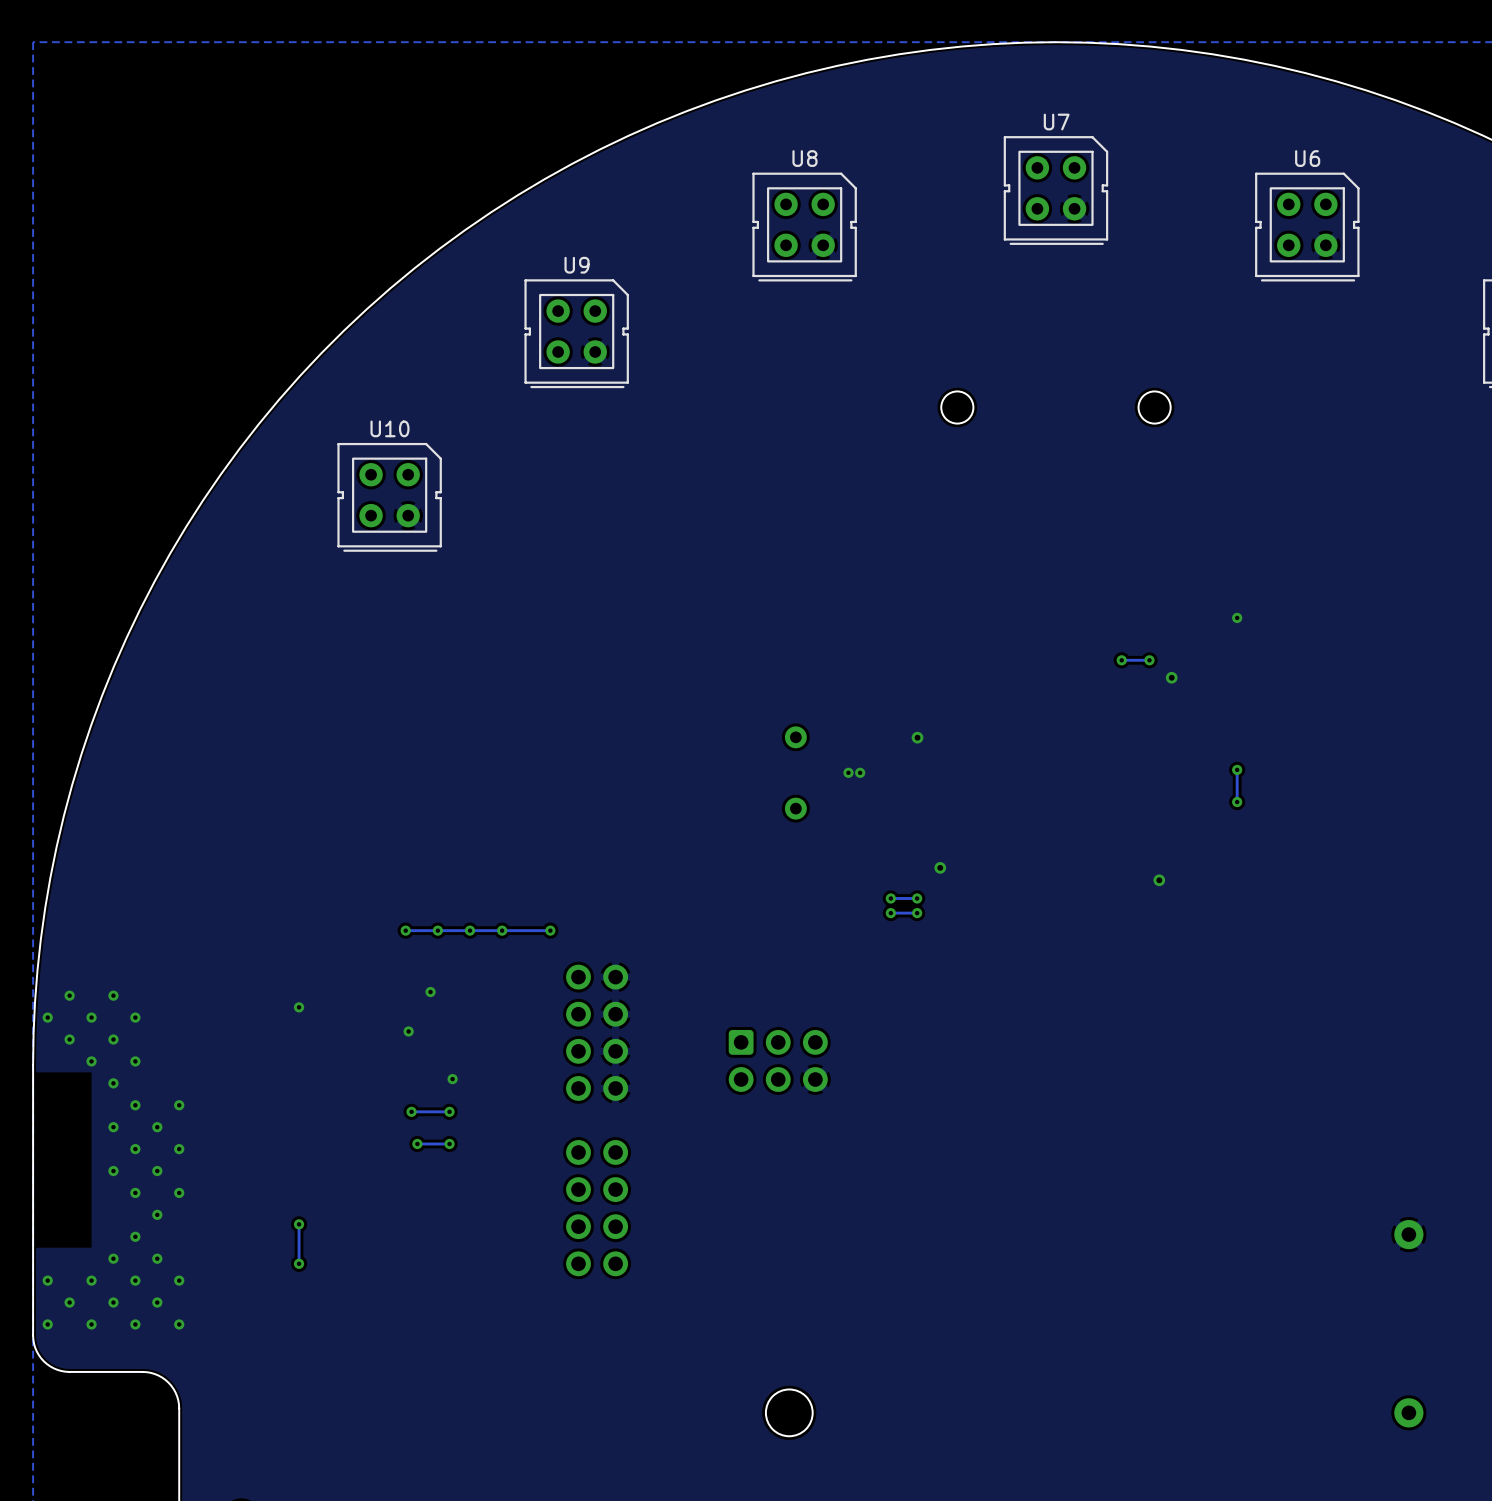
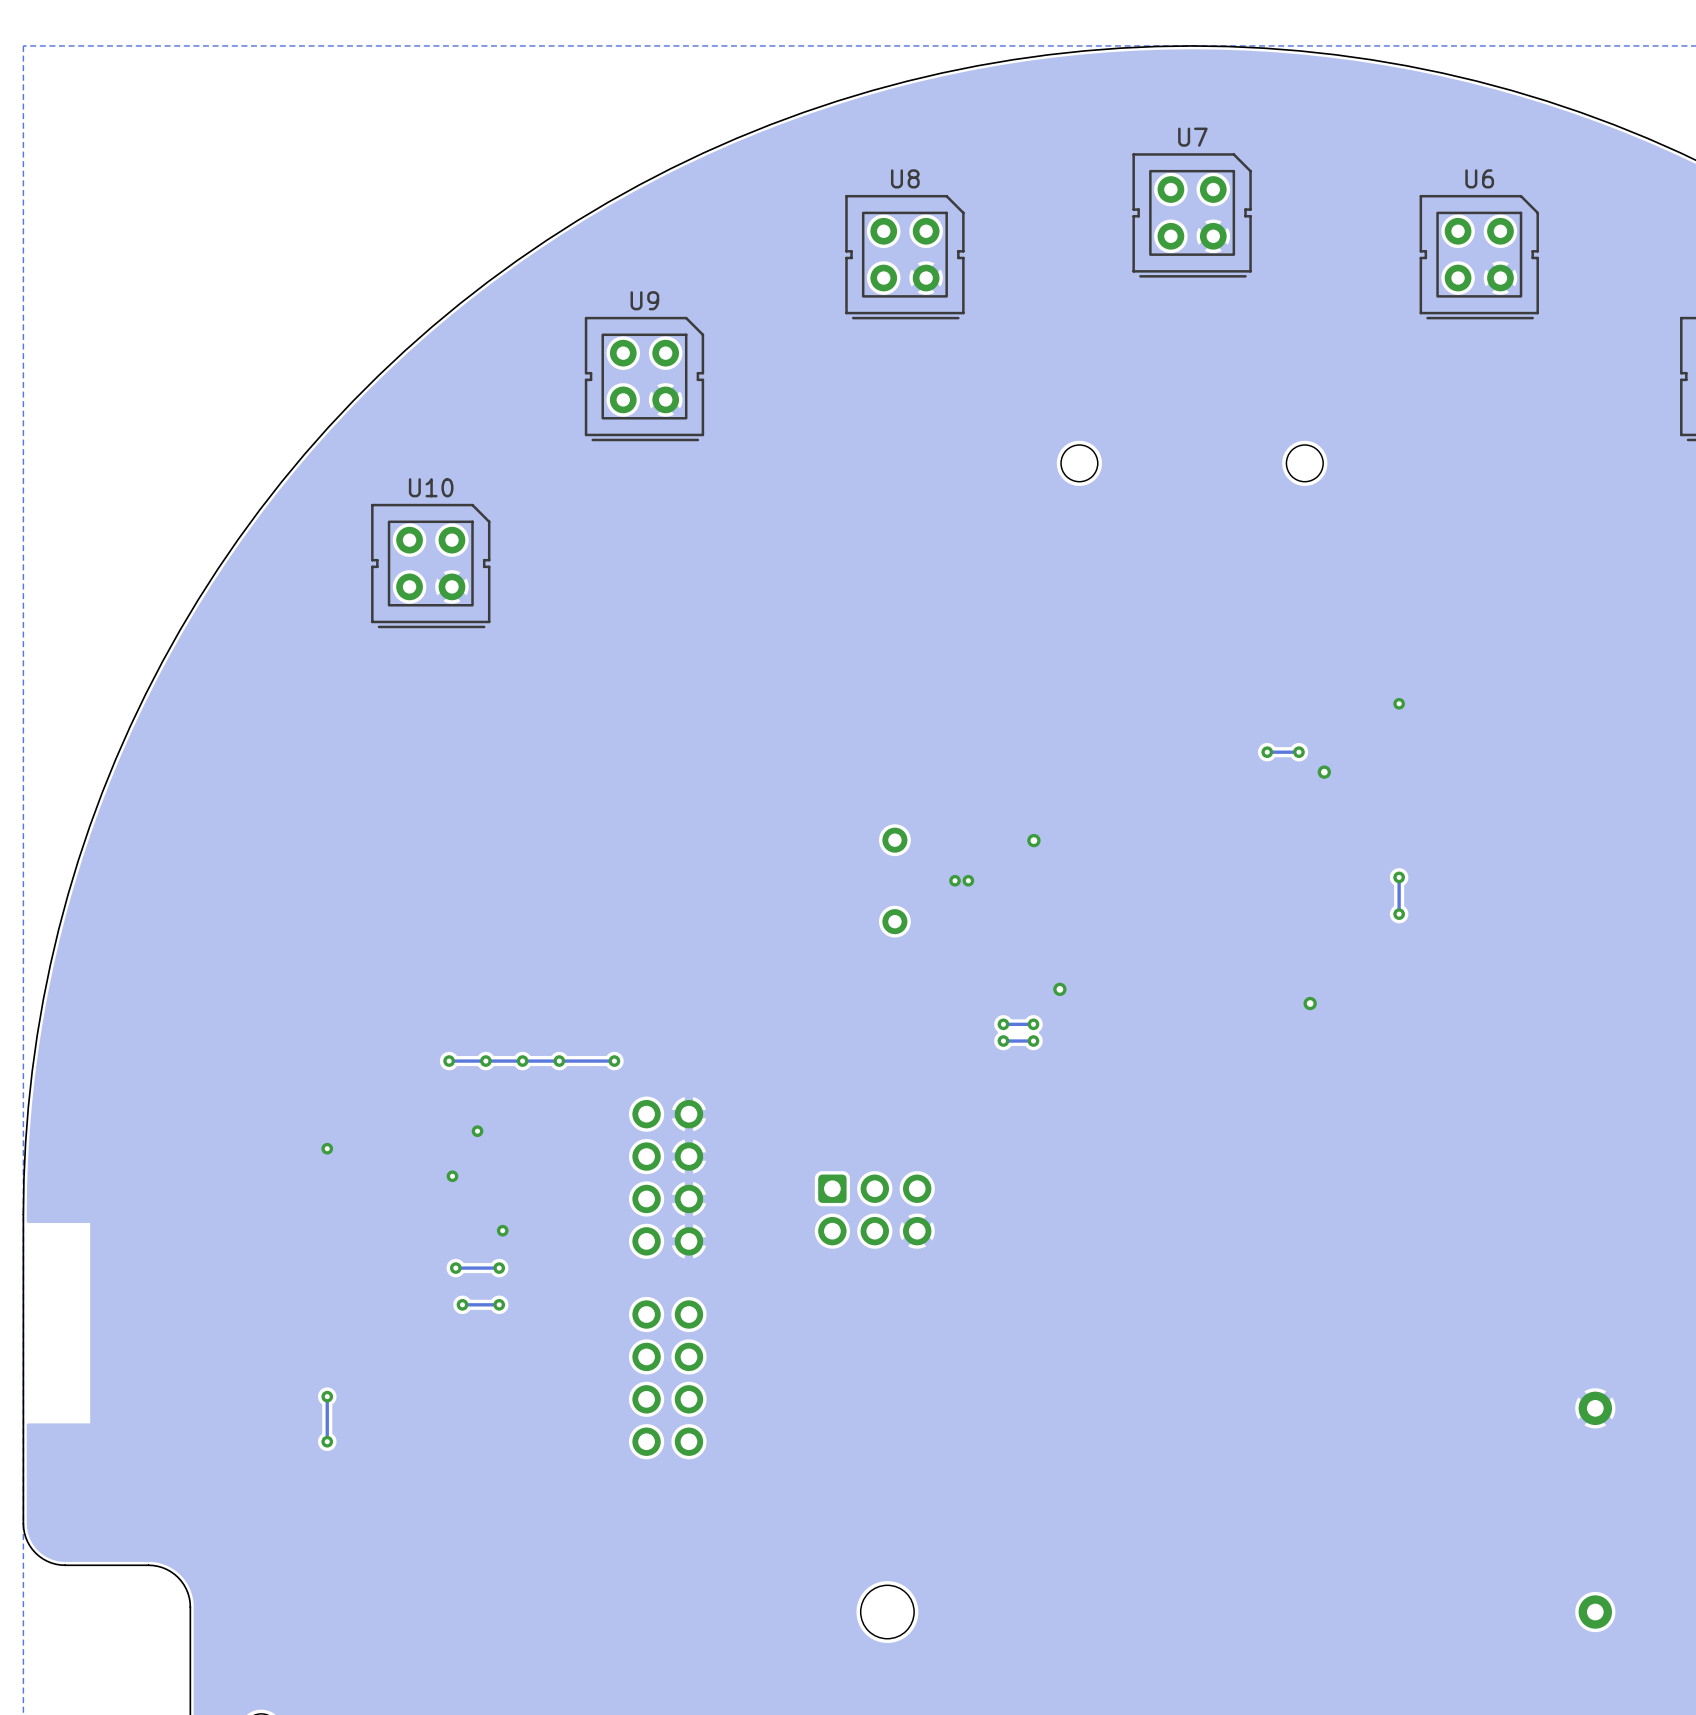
via: (69, 995) -> none
via: (113, 995) -> none
via: (47, 1017) -> none
via: (91, 1017) -> none
via: (135, 1017) -> none
via: (69, 1039) -> none
via: (113, 1039) -> none
via: (91, 1061) -> none
via: (135, 1061) -> none
via: (113, 1083) -> none
via: (135, 1105) -> none
via: (179, 1105) -> none
via: (113, 1127) -> none
via: (157, 1127) -> none
via: (135, 1149) -> none
via: (179, 1149) -> none
via: (113, 1171) -> none
via: (157, 1171) -> none
via: (135, 1192) -> none
via: (179, 1192) -> none
via: (157, 1214) -> none
via: (135, 1236) -> none
via: (113, 1258) -> none
via: (157, 1258) -> none
via: (47, 1280) -> none
via: (91, 1280) -> none
via: (135, 1280) -> none
via: (179, 1280) -> none
via: (69, 1302) -> none
via: (113, 1302) -> none
via: (157, 1302) -> none
via: (47, 1324) -> none
via: (91, 1324) -> none
via: (135, 1324) -> none
via: (179, 1324) -> none

